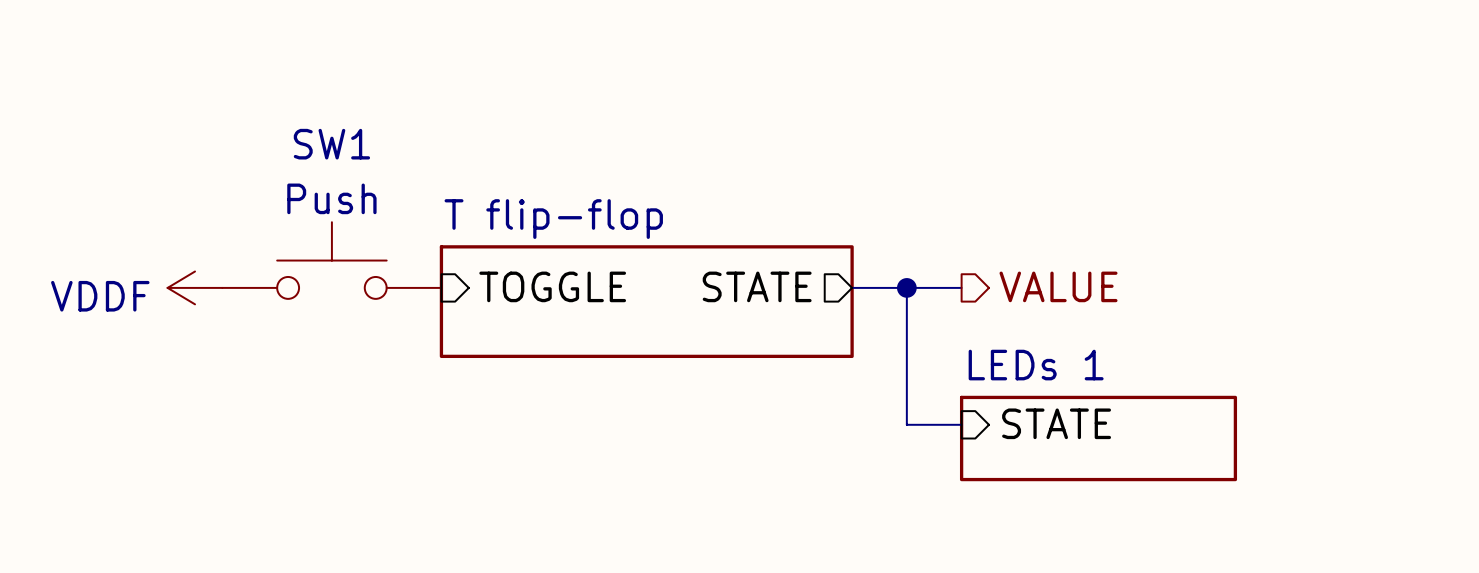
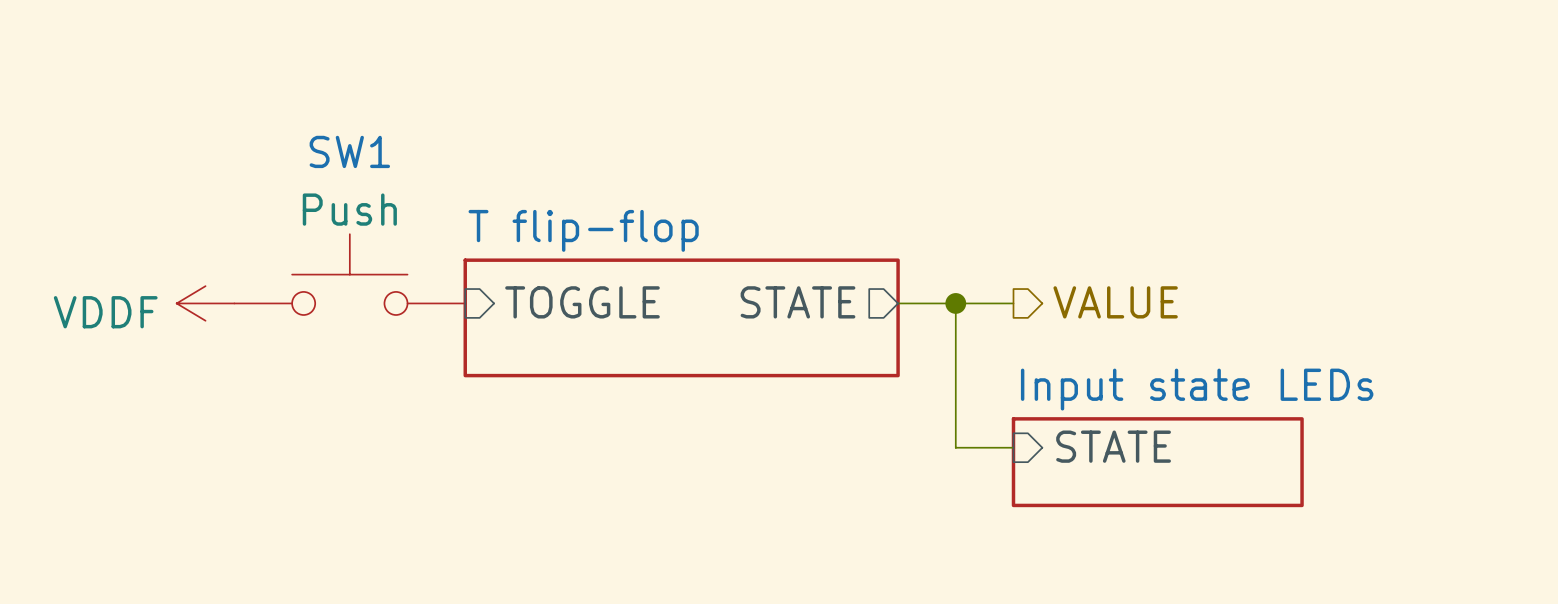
sheet LEDs 1 name: LEDs 1 (1036, 365) -> Input state LEDs (1197, 389)

